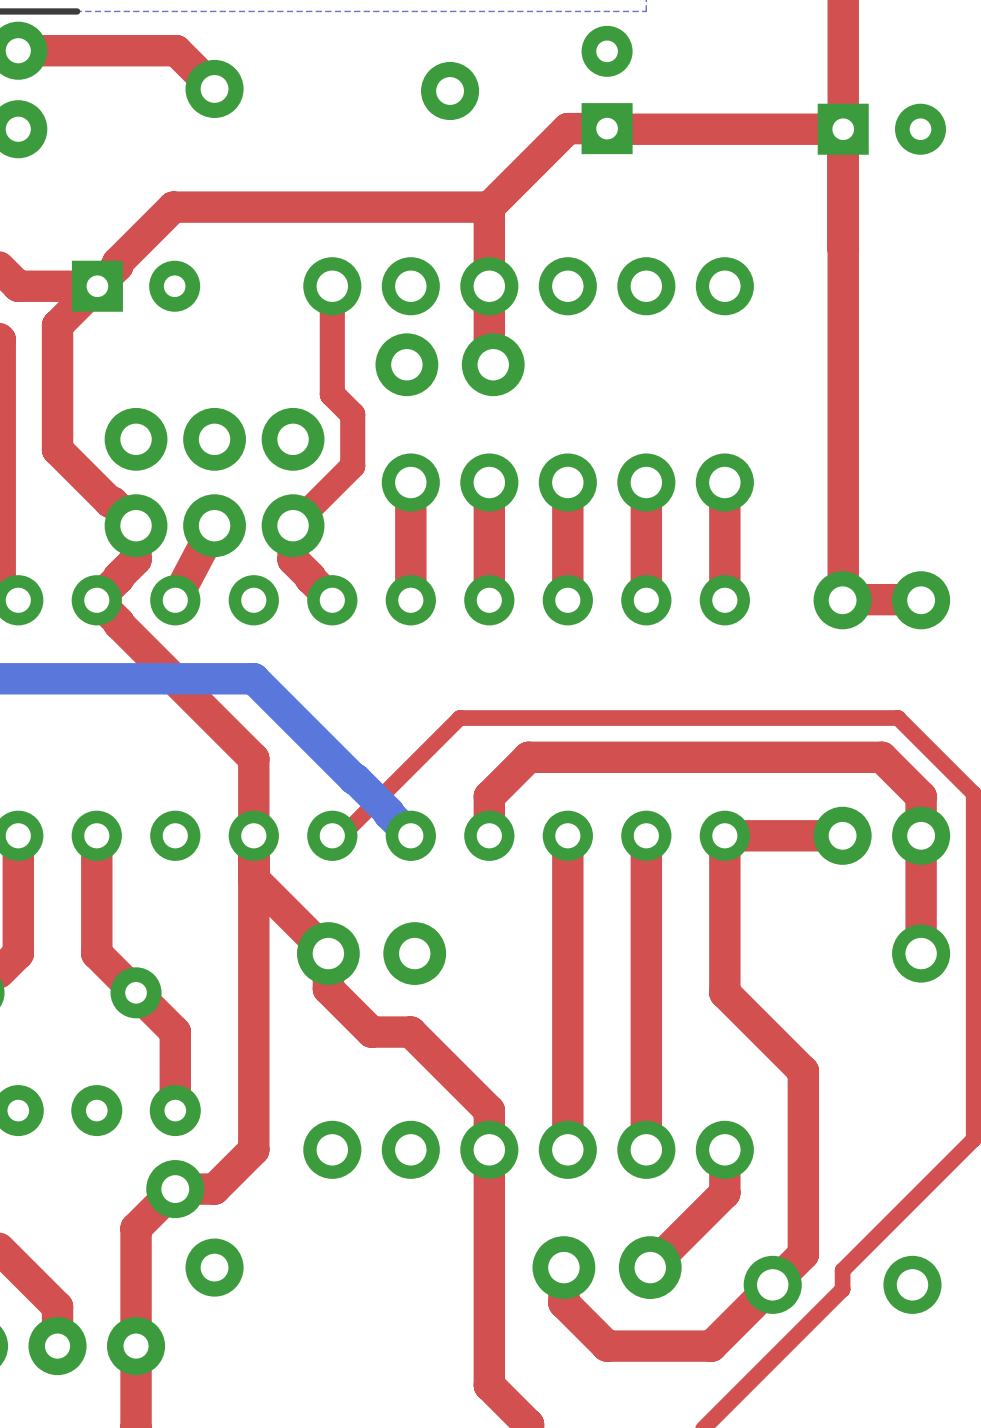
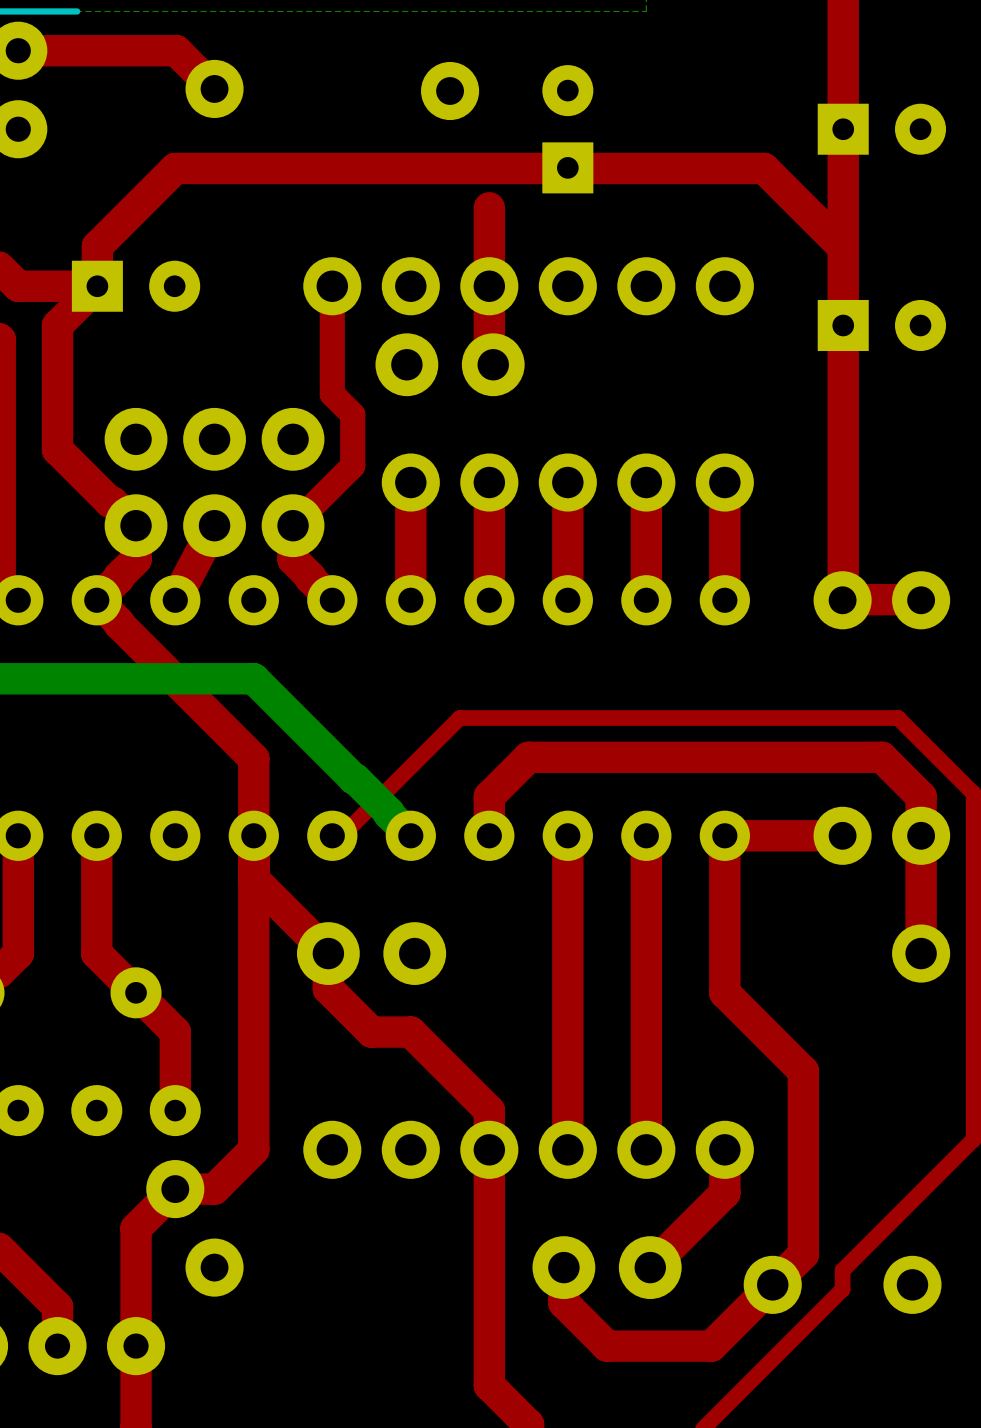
part position: (607, 89) -> (567, 129)
top track: (843, 129) (567, 128) (489, 207) (173, 207) (117, 262) (117, 265) (97, 286) -> (842, 246) (764, 168) (175, 168) (97, 246) (97, 286)
part: none -> (881, 325)

